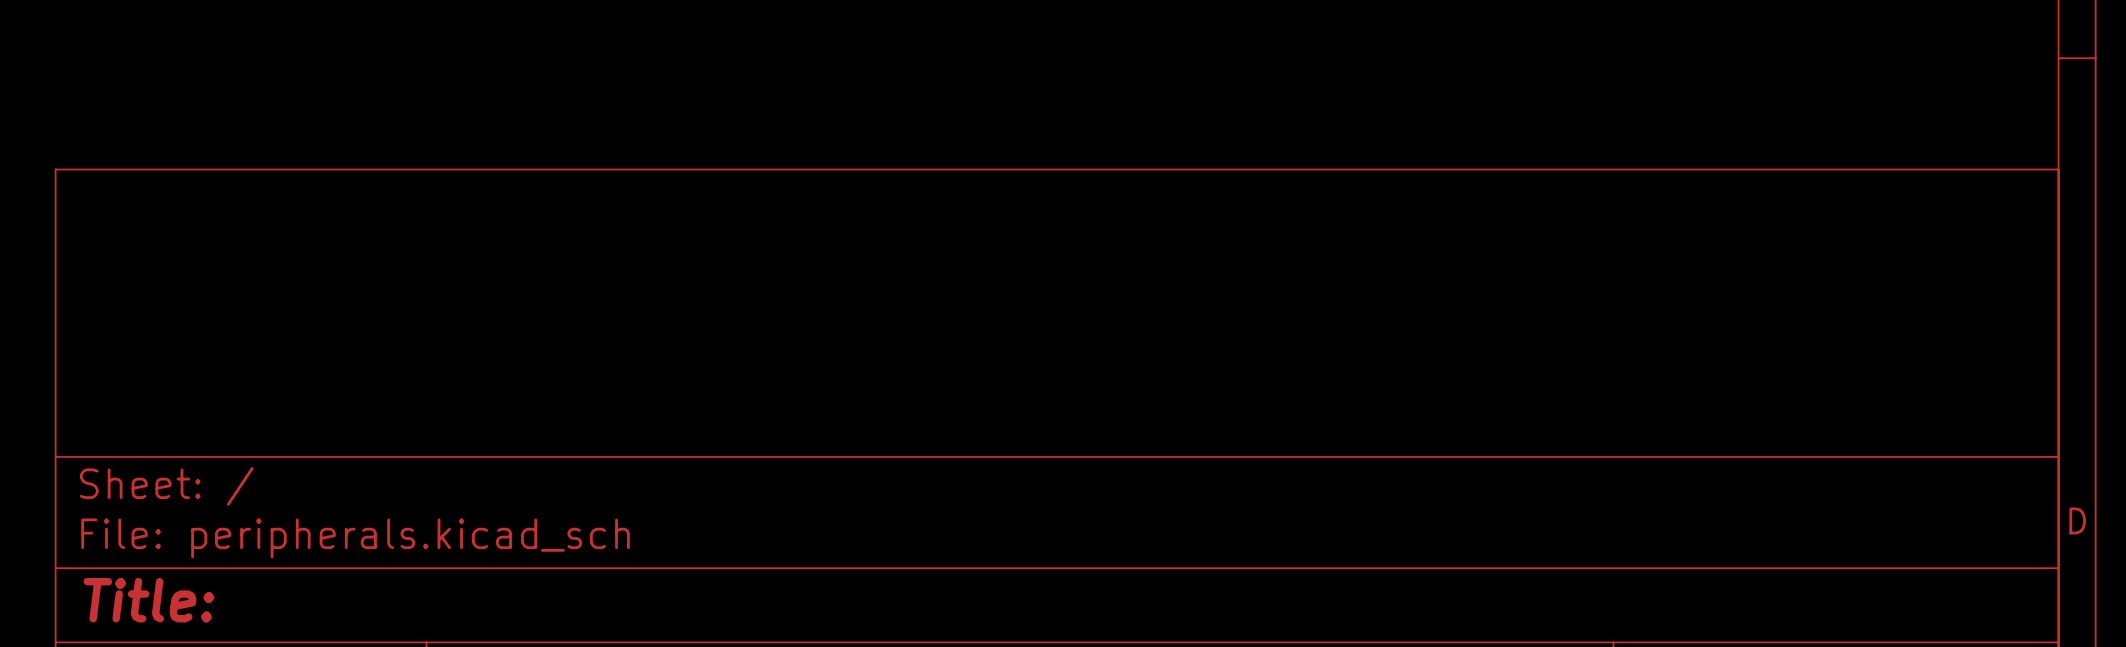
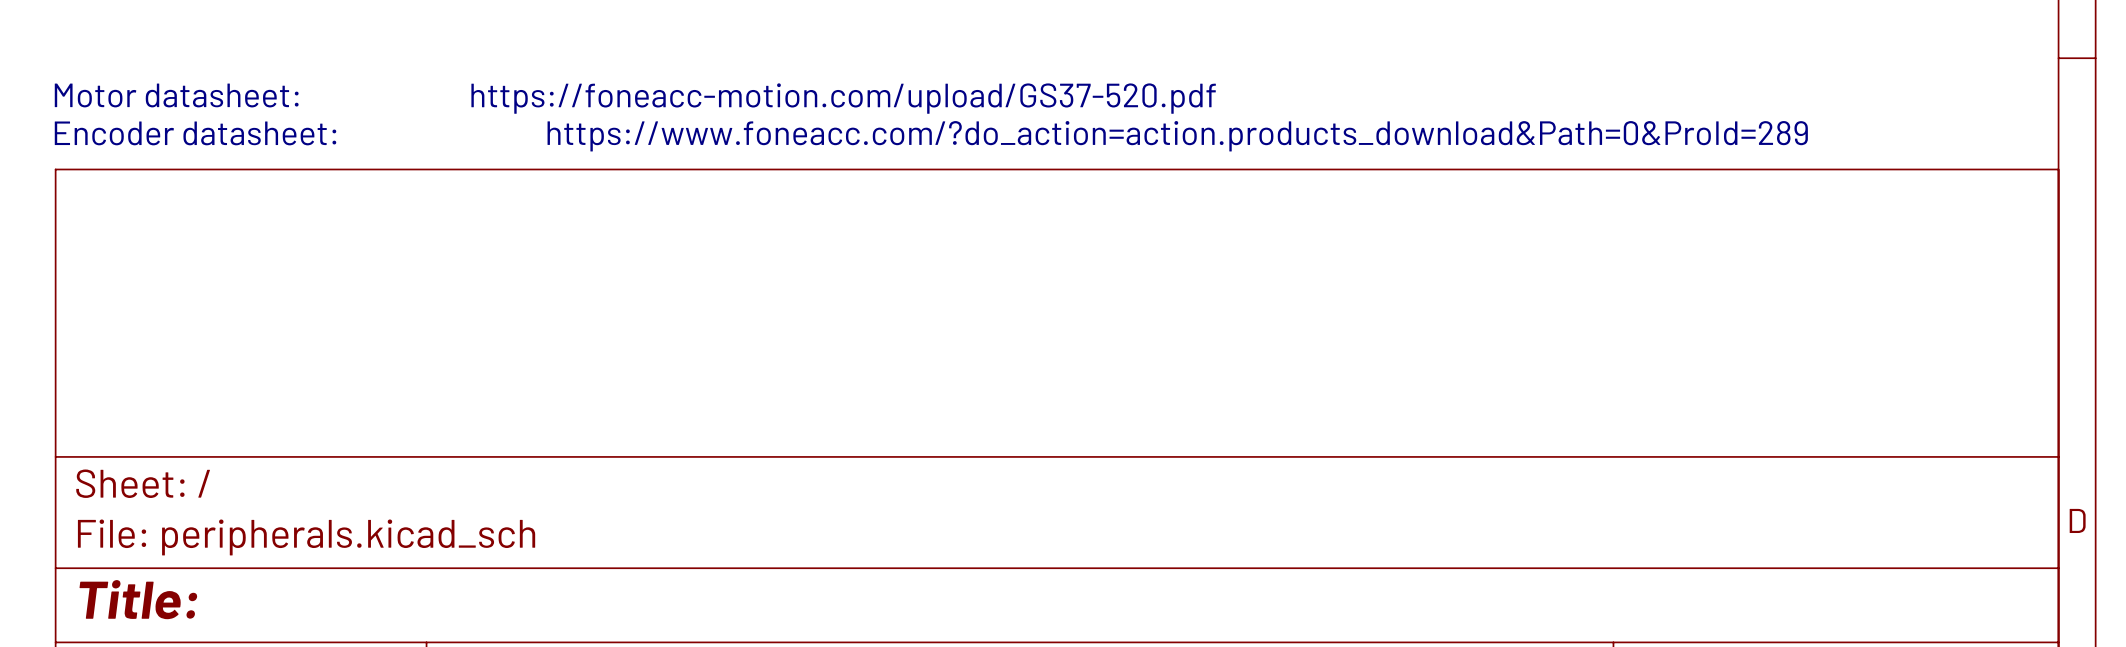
text: none -> Motor datasheet: (176, 95)
text: none -> https://foneacc-motion.com/upload/GS37-520.pdf (843, 98)
text: none -> Encoder datasheet: (195, 133)
text: none -> https://www.foneacc.com/?do_action=action.products_download&Path=0&ProId=289 (1177, 136)

